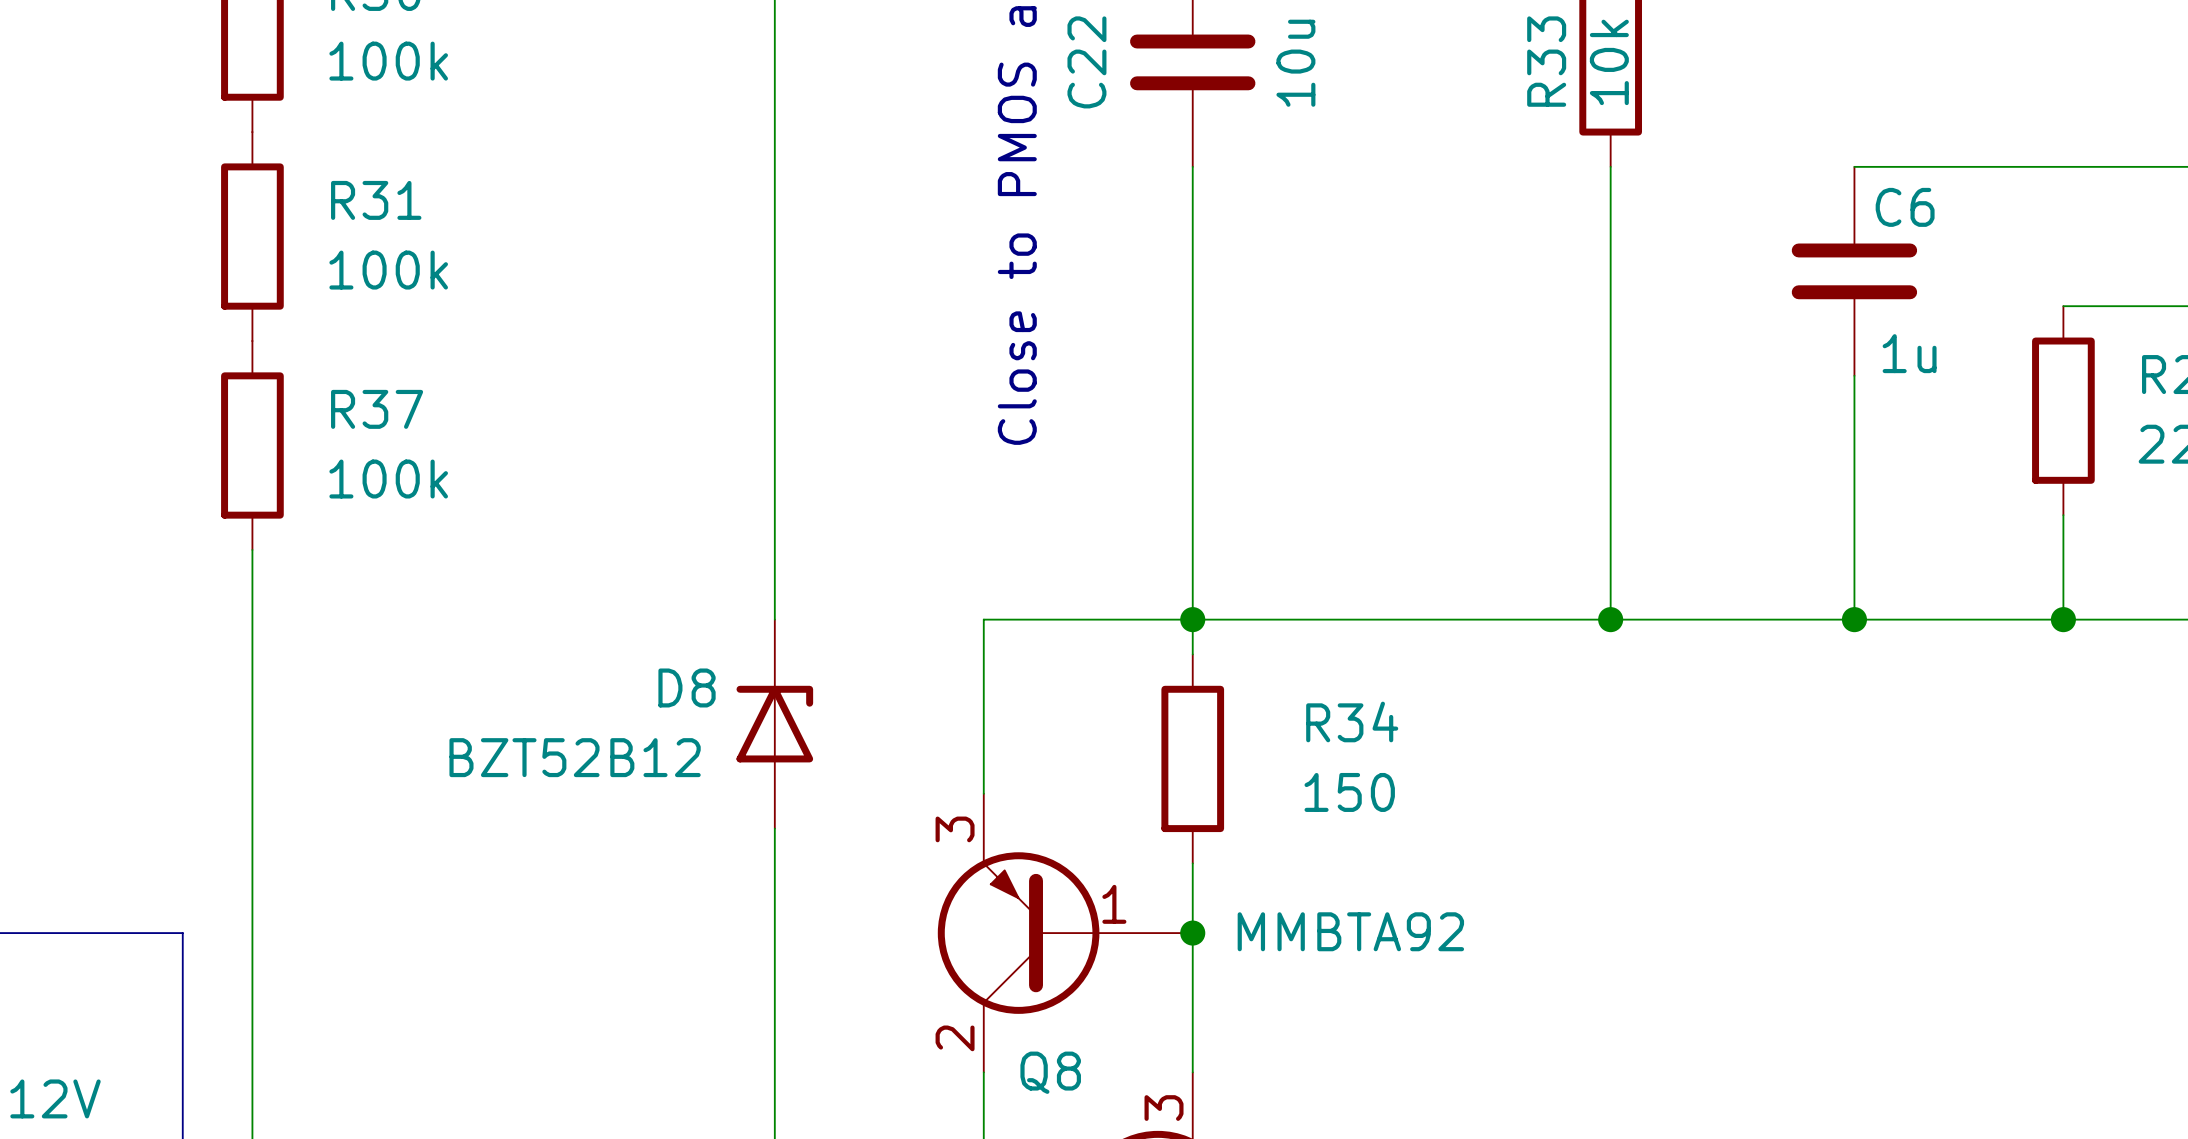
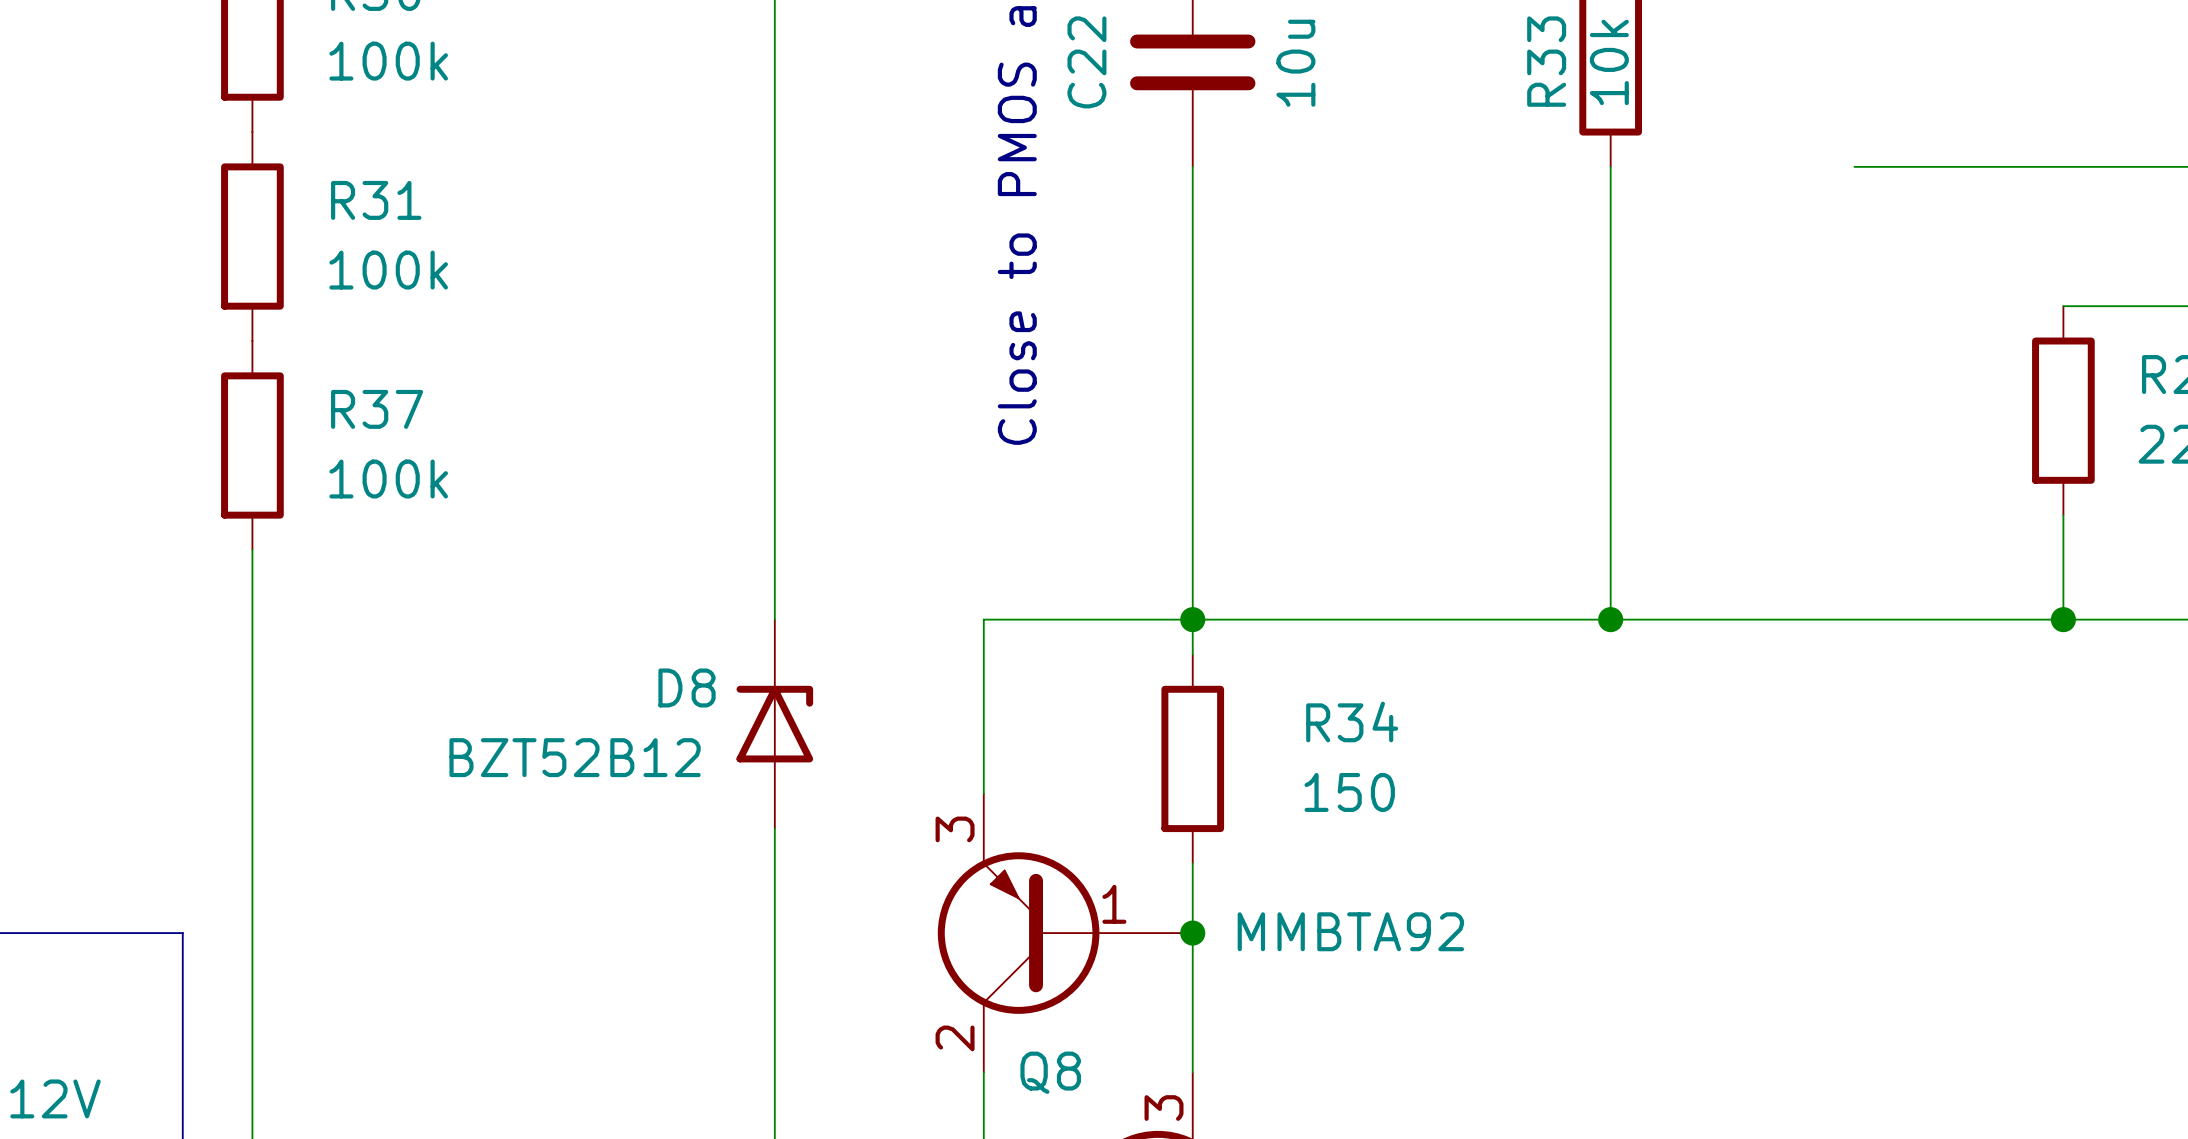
C6: 1u (1854, 271) -> none
wire: (1854, 375) (1854, 619) -> none
junction: (1854, 619) -> none

